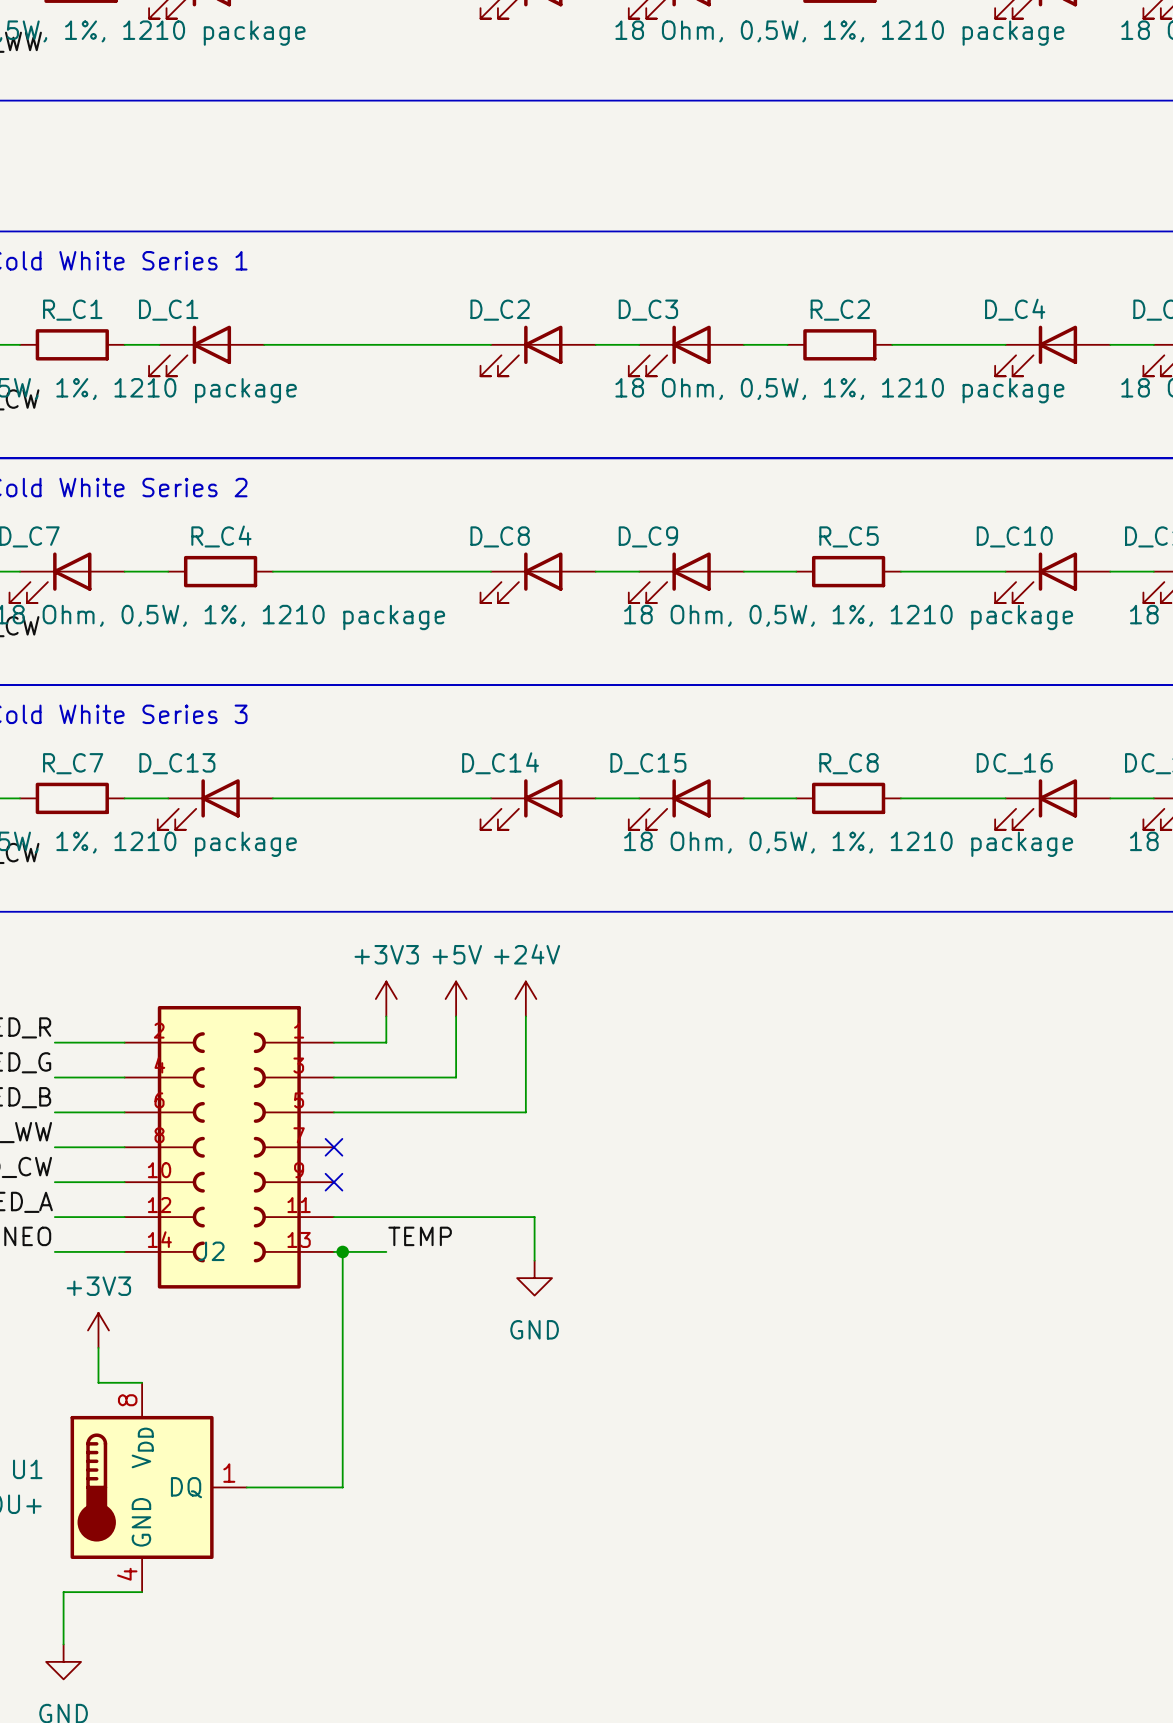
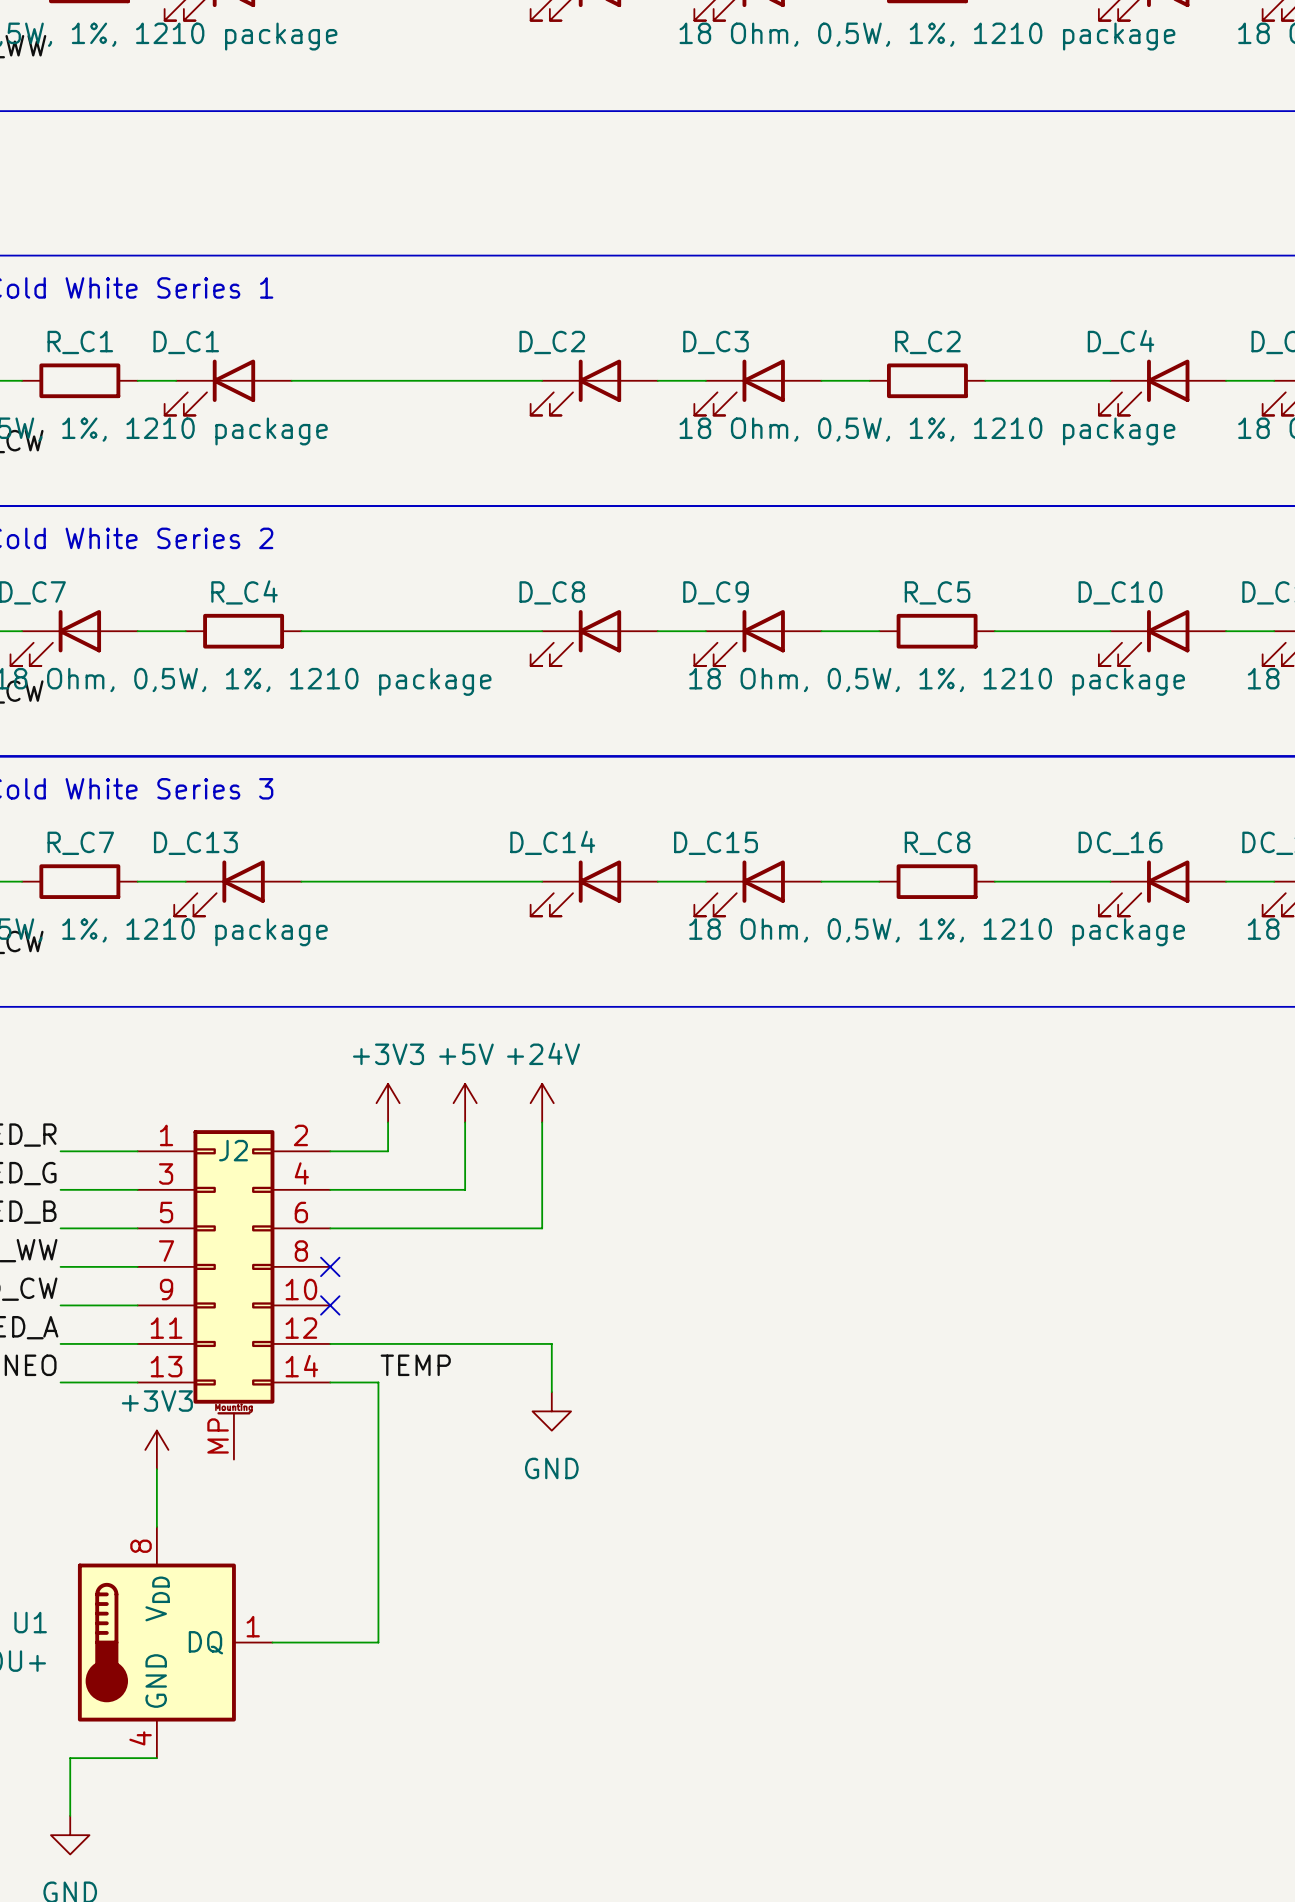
power symbol position: +3V3 (386, 999) -> +3V3 (388, 1103)
power symbol position: +5V (456, 999) -> +5V (465, 1103)
power symbol position: +24V (525, 999) -> +24V (542, 1103)
J2 symbol: [124, 1005, 334, 1289] -> [137, 1130, 331, 1460]
wire: (386, 1016) (386, 1042) (351, 1042) -> (388, 1122) (388, 1151)
wire: (456, 1016) (456, 1077) (421, 1077) -> (465, 1122) (465, 1189)
wire: (525, 1016) (525, 1112) (490, 1112) -> (542, 1122) (542, 1228)
no-connect mark: none -> (330, 1266)
no-connect mark: (333, 1147) -> none
no-connect mark: none -> (330, 1305)
no-connect mark: (333, 1182) -> none
wire: (499, 1217) (534, 1217) (534, 1260) -> (551, 1343) (551, 1392)
label position: TEMP (420, 1236) -> TEMP (415, 1365)
J2 name position: J2 (211, 1251) -> J2 (233, 1150)
wire: (342, 1251) (386, 1251) -> none
junction: (342, 1251) -> none
power symbol position: GND (534, 1278) -> GND (551, 1411)
power symbol position: +3V3 (98, 1330) -> +3V3 (156, 1449)
wire: (98, 1347) (98, 1382) (142, 1382) -> (156, 1469) (156, 1526)

